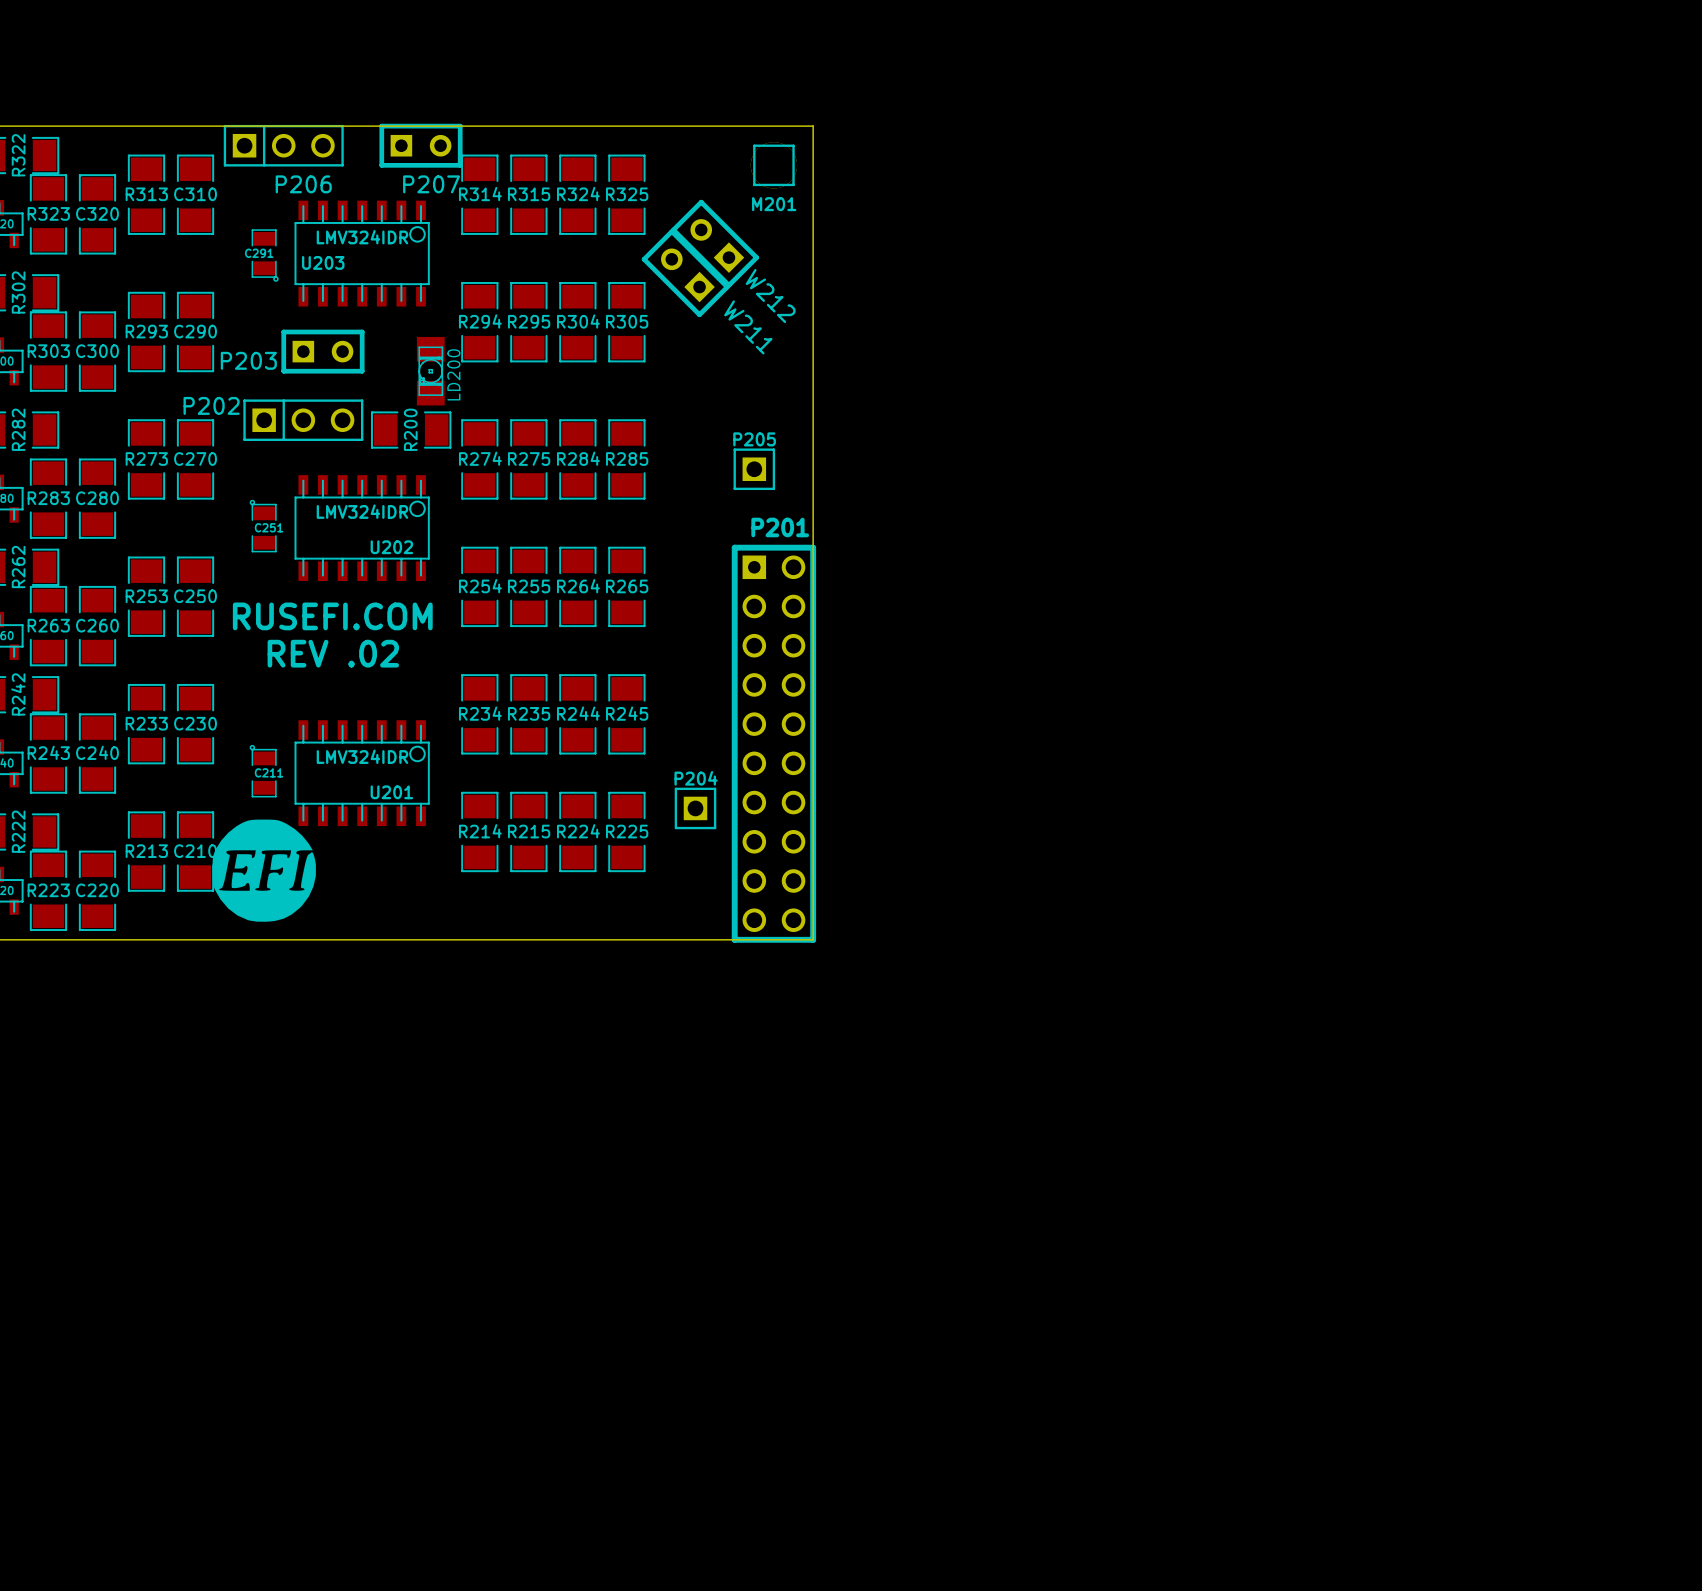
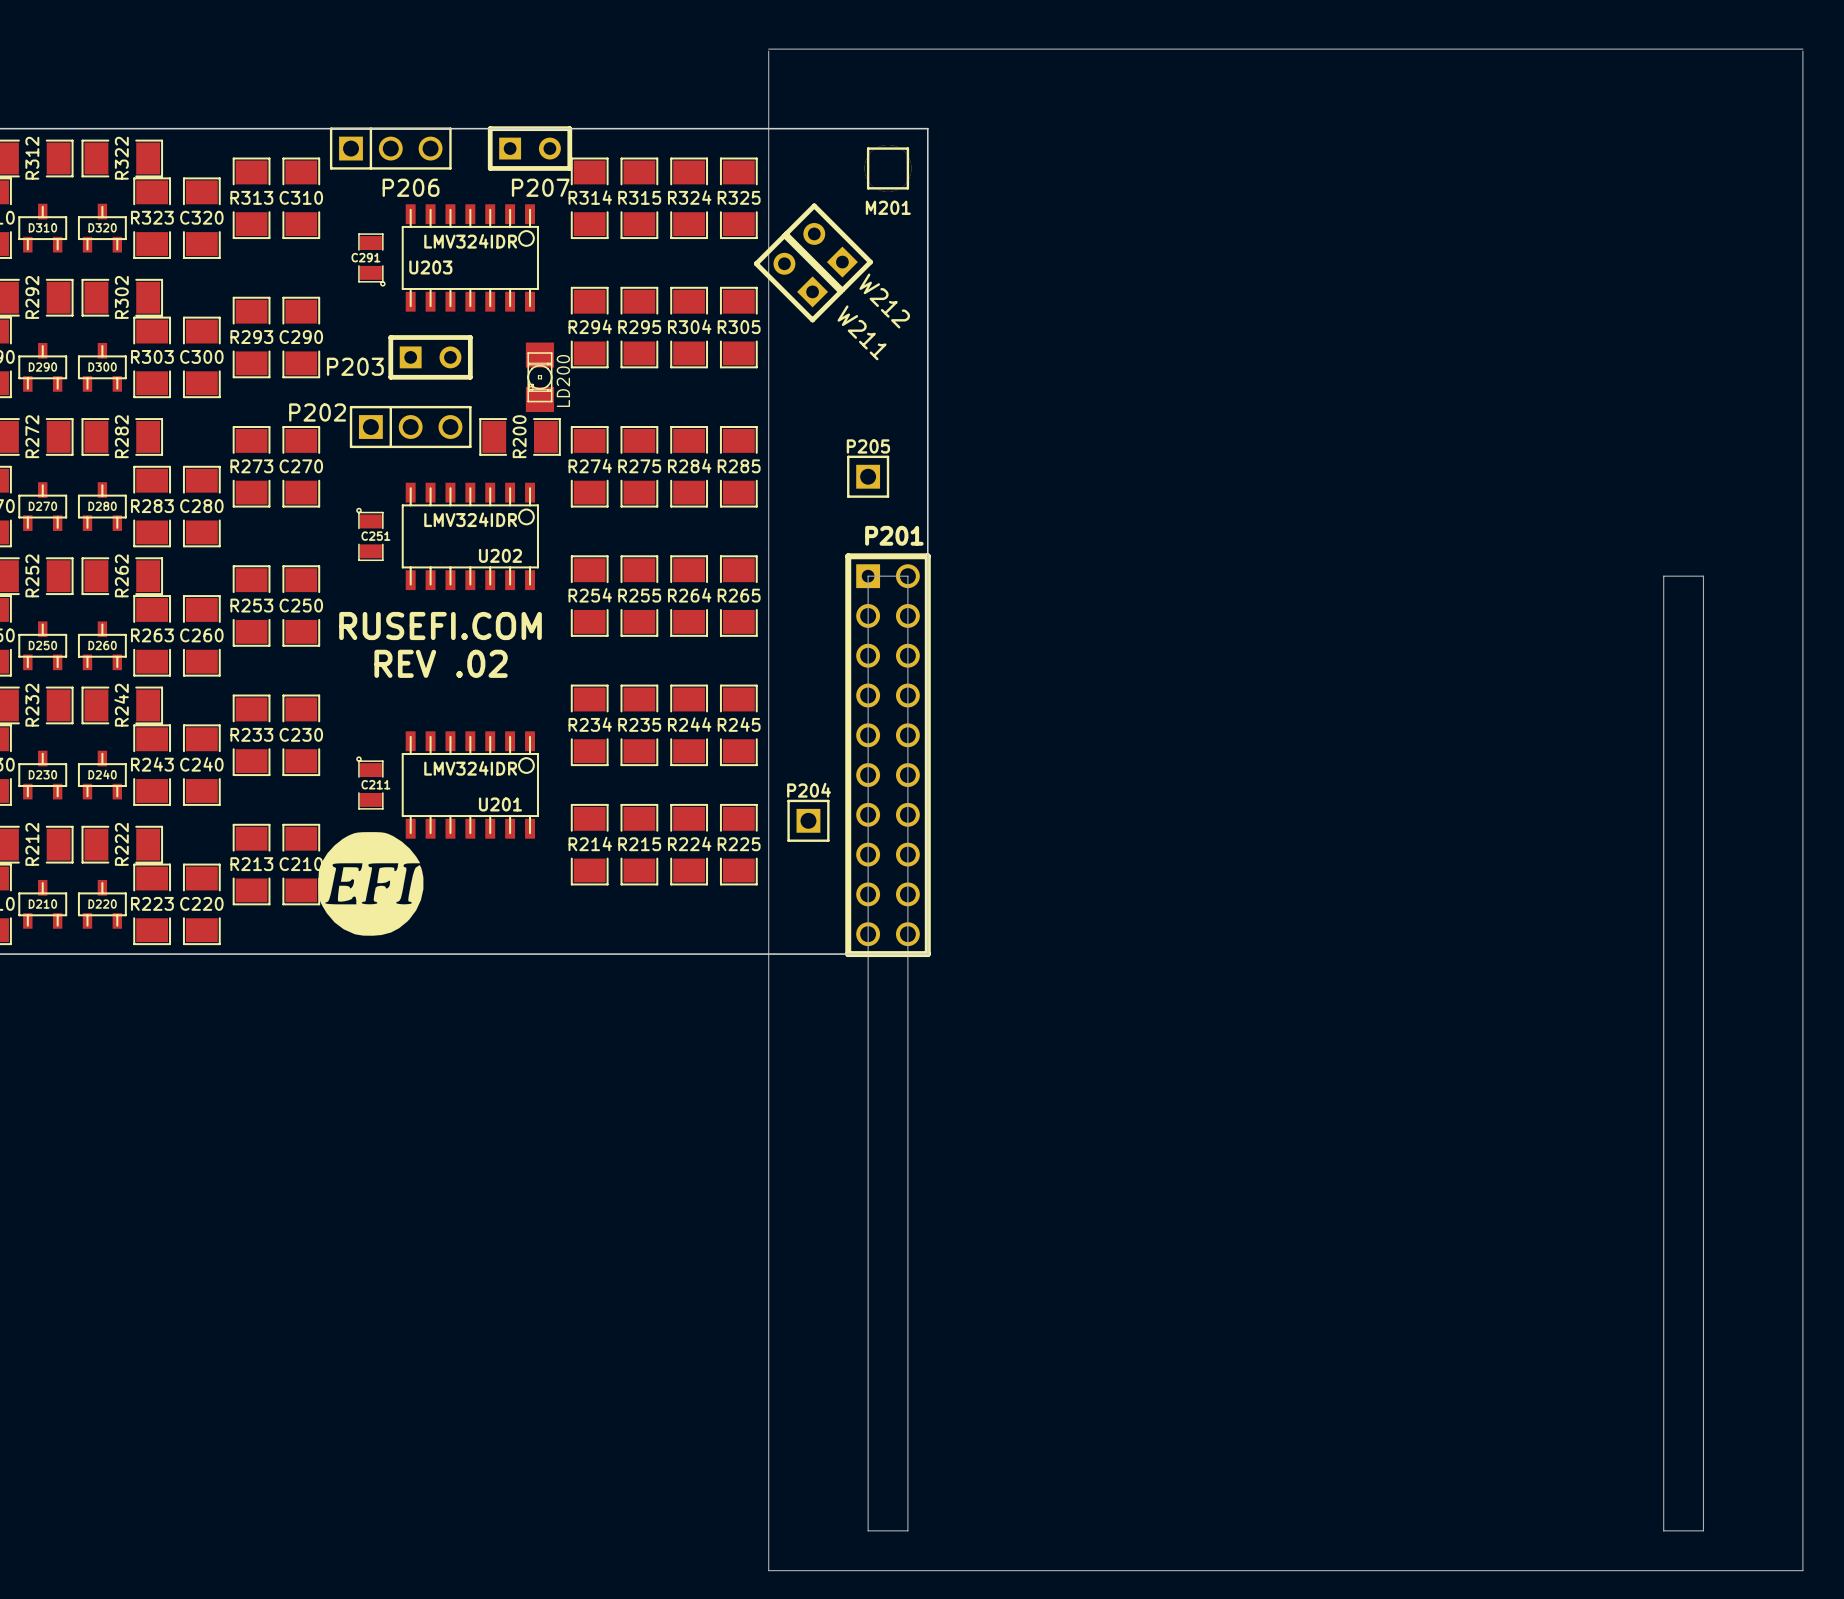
line: none -> (768, 49) (1802, 49)
line: none -> (768, 51) (768, 1570) (1802, 1570) (1802, 51)
line: none -> (868, 576) (907, 576) (907, 1530) (868, 1530) (868, 576)
line: none -> (1663, 576) (1703, 576) (1703, 1530) (1663, 1530) (1663, 576)

